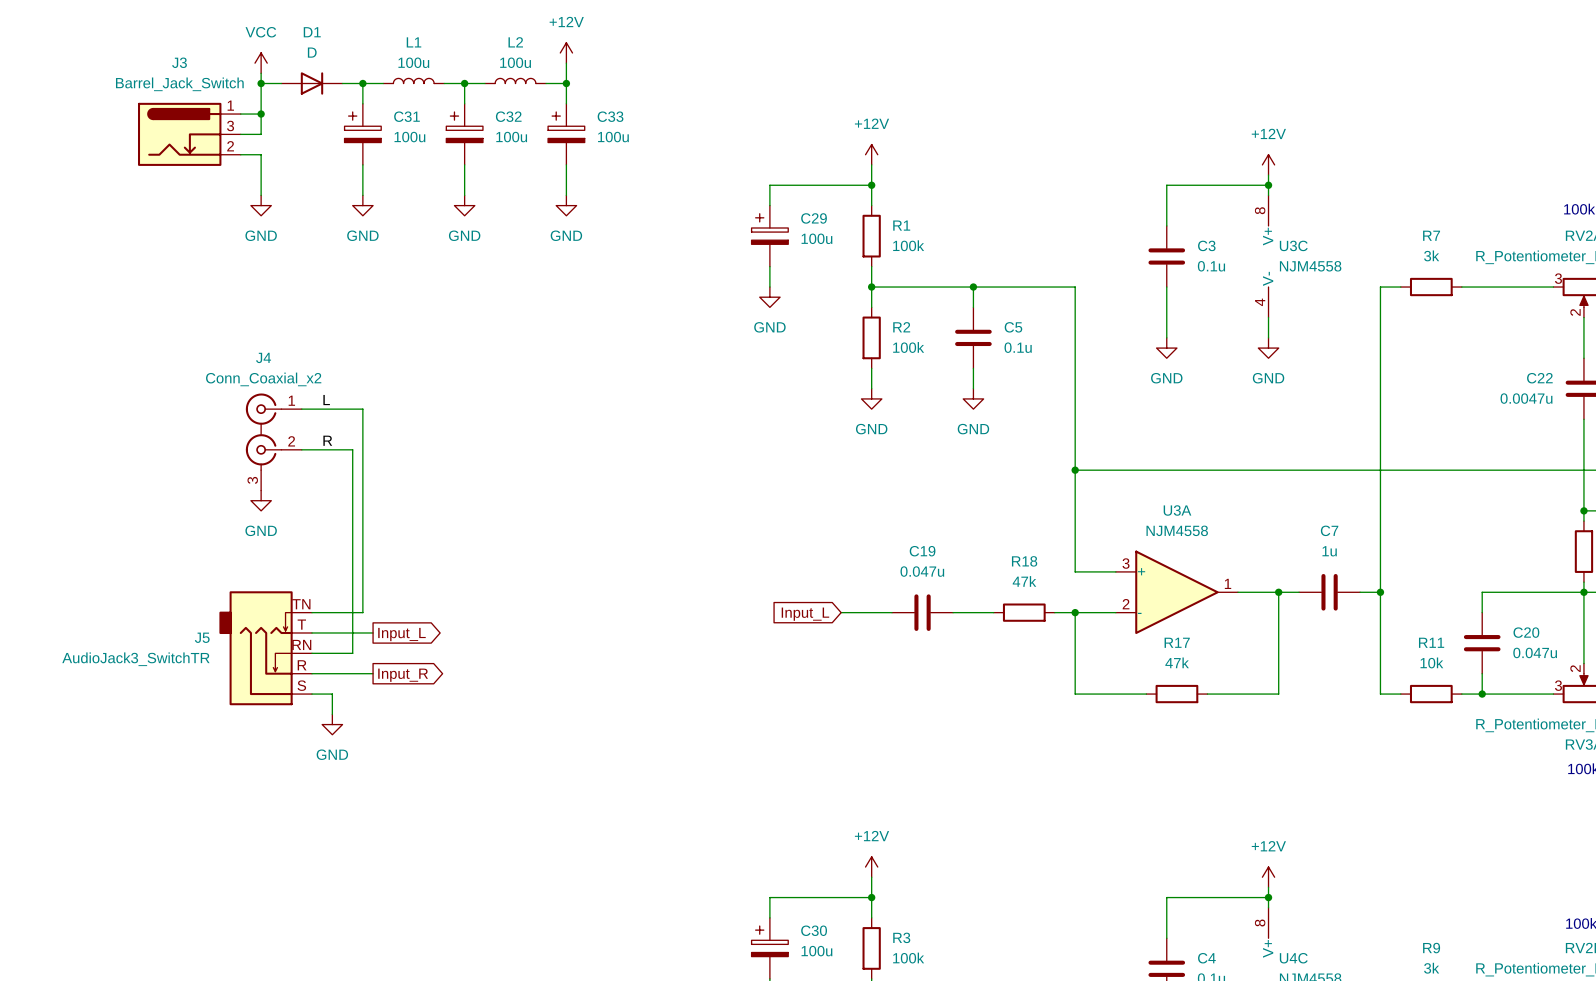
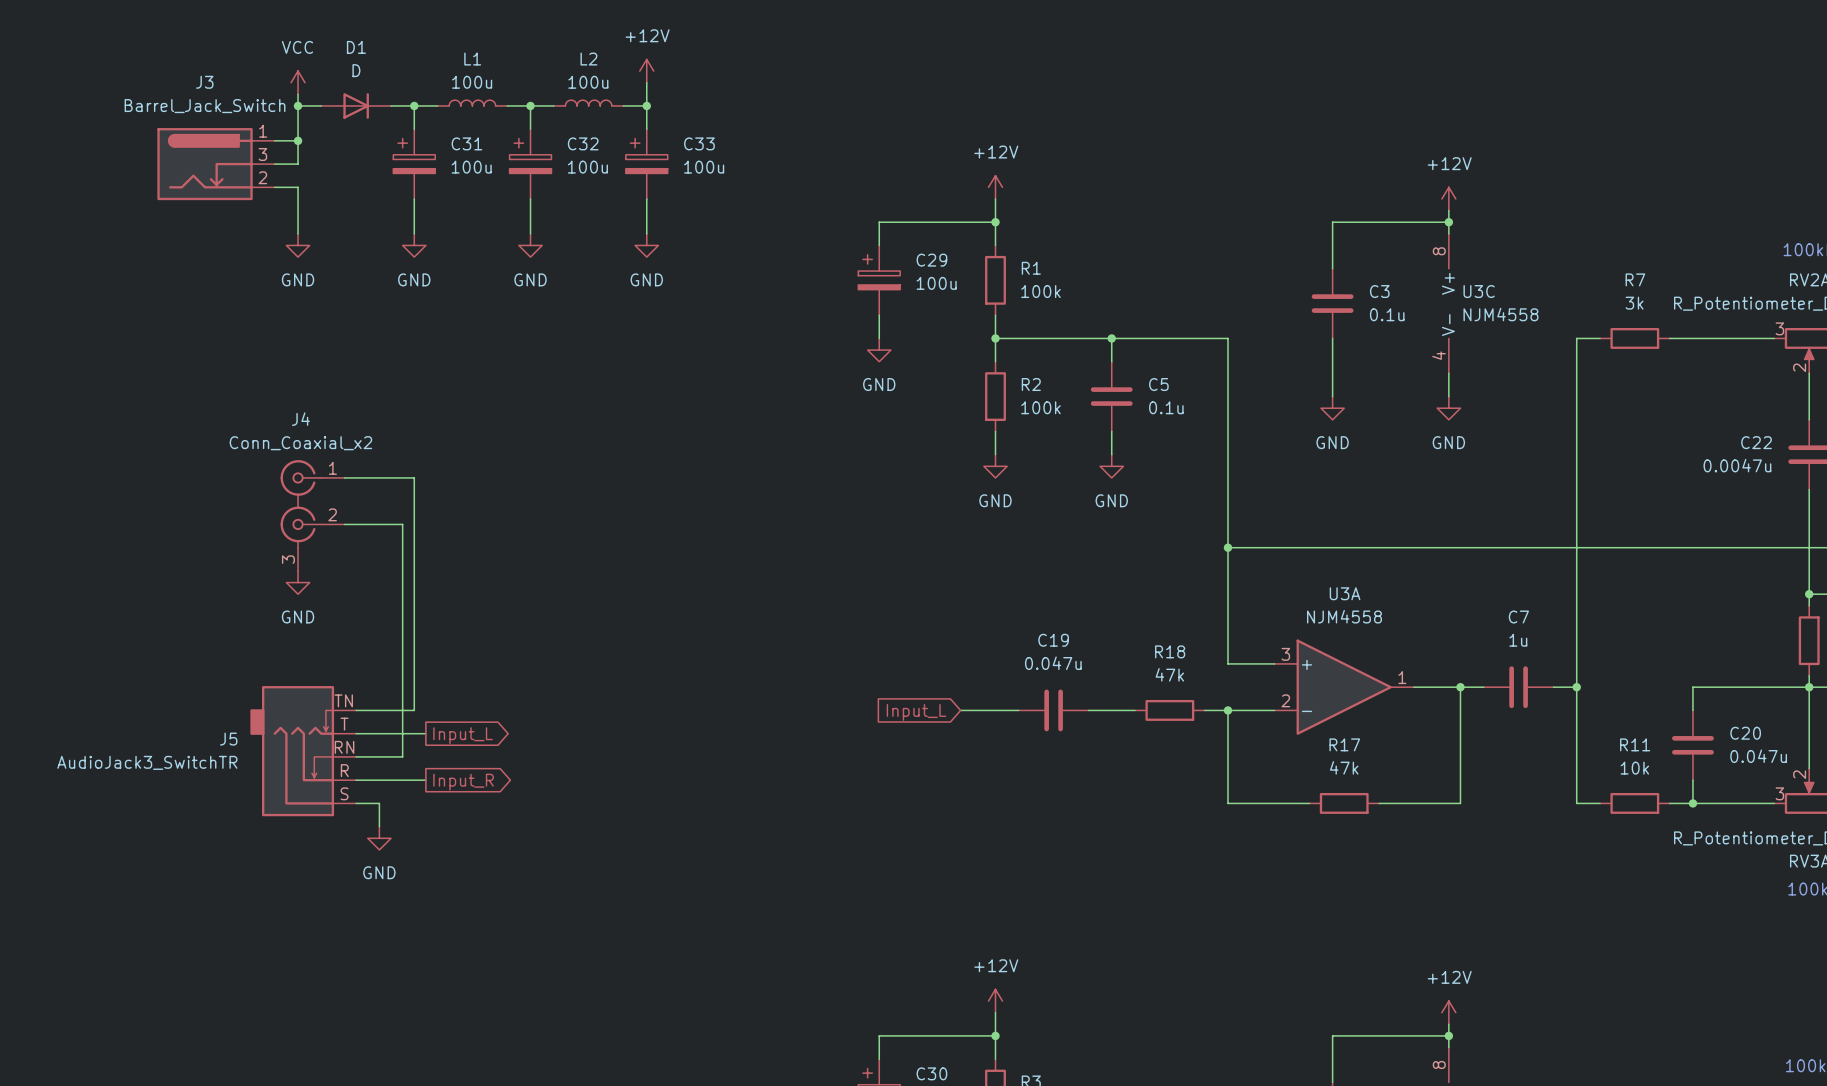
label: L (326, 400) -> none
label: R (327, 440) -> none

